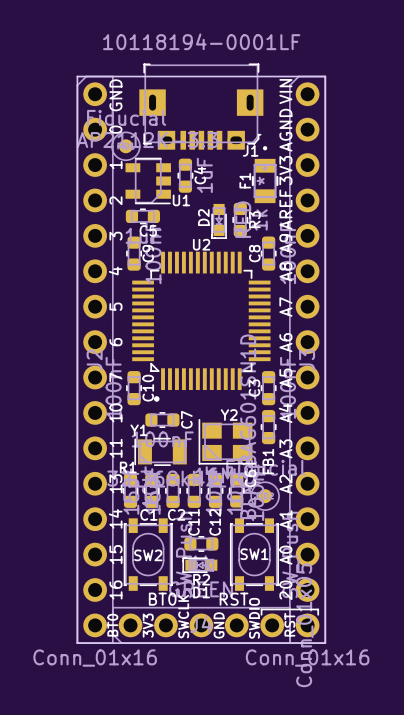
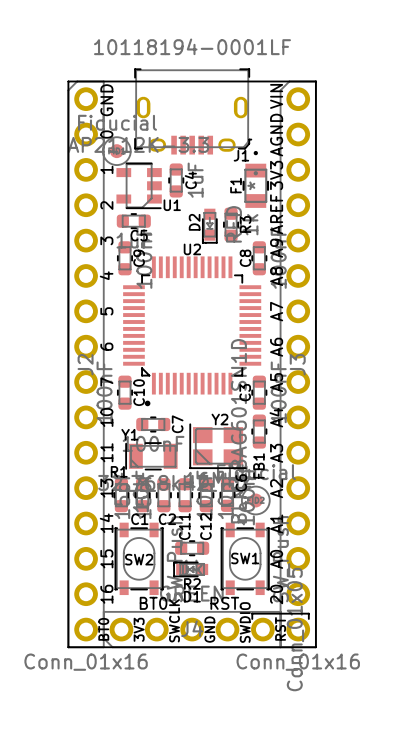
J1 footprint: [139, 63, 264, 150] -> [134, 68, 253, 155]

